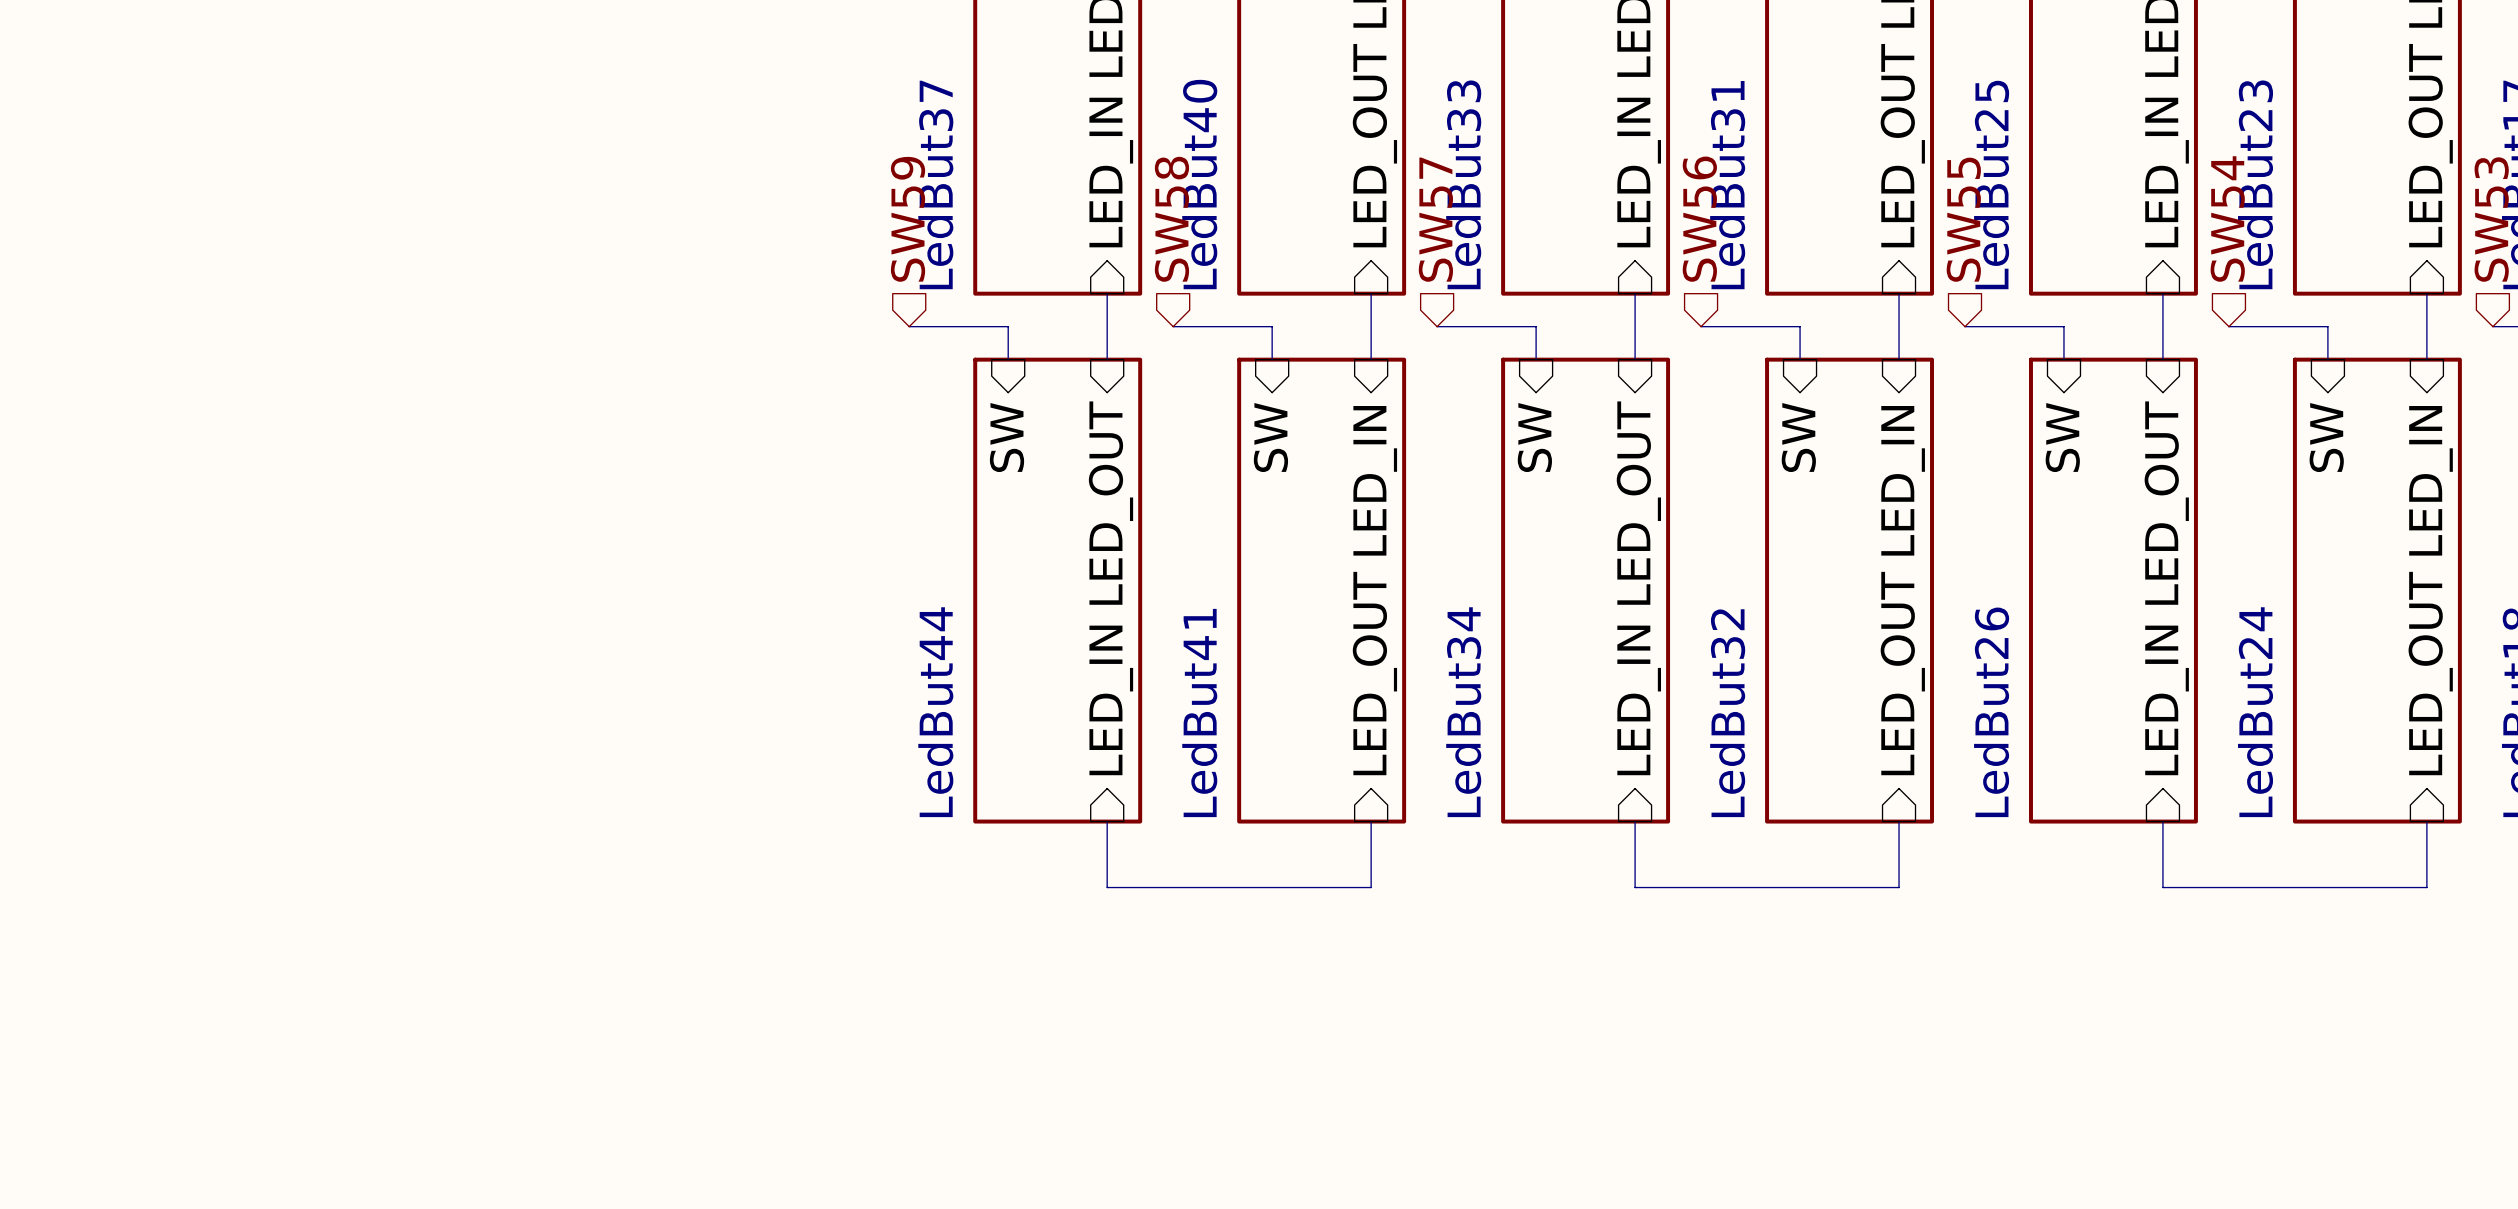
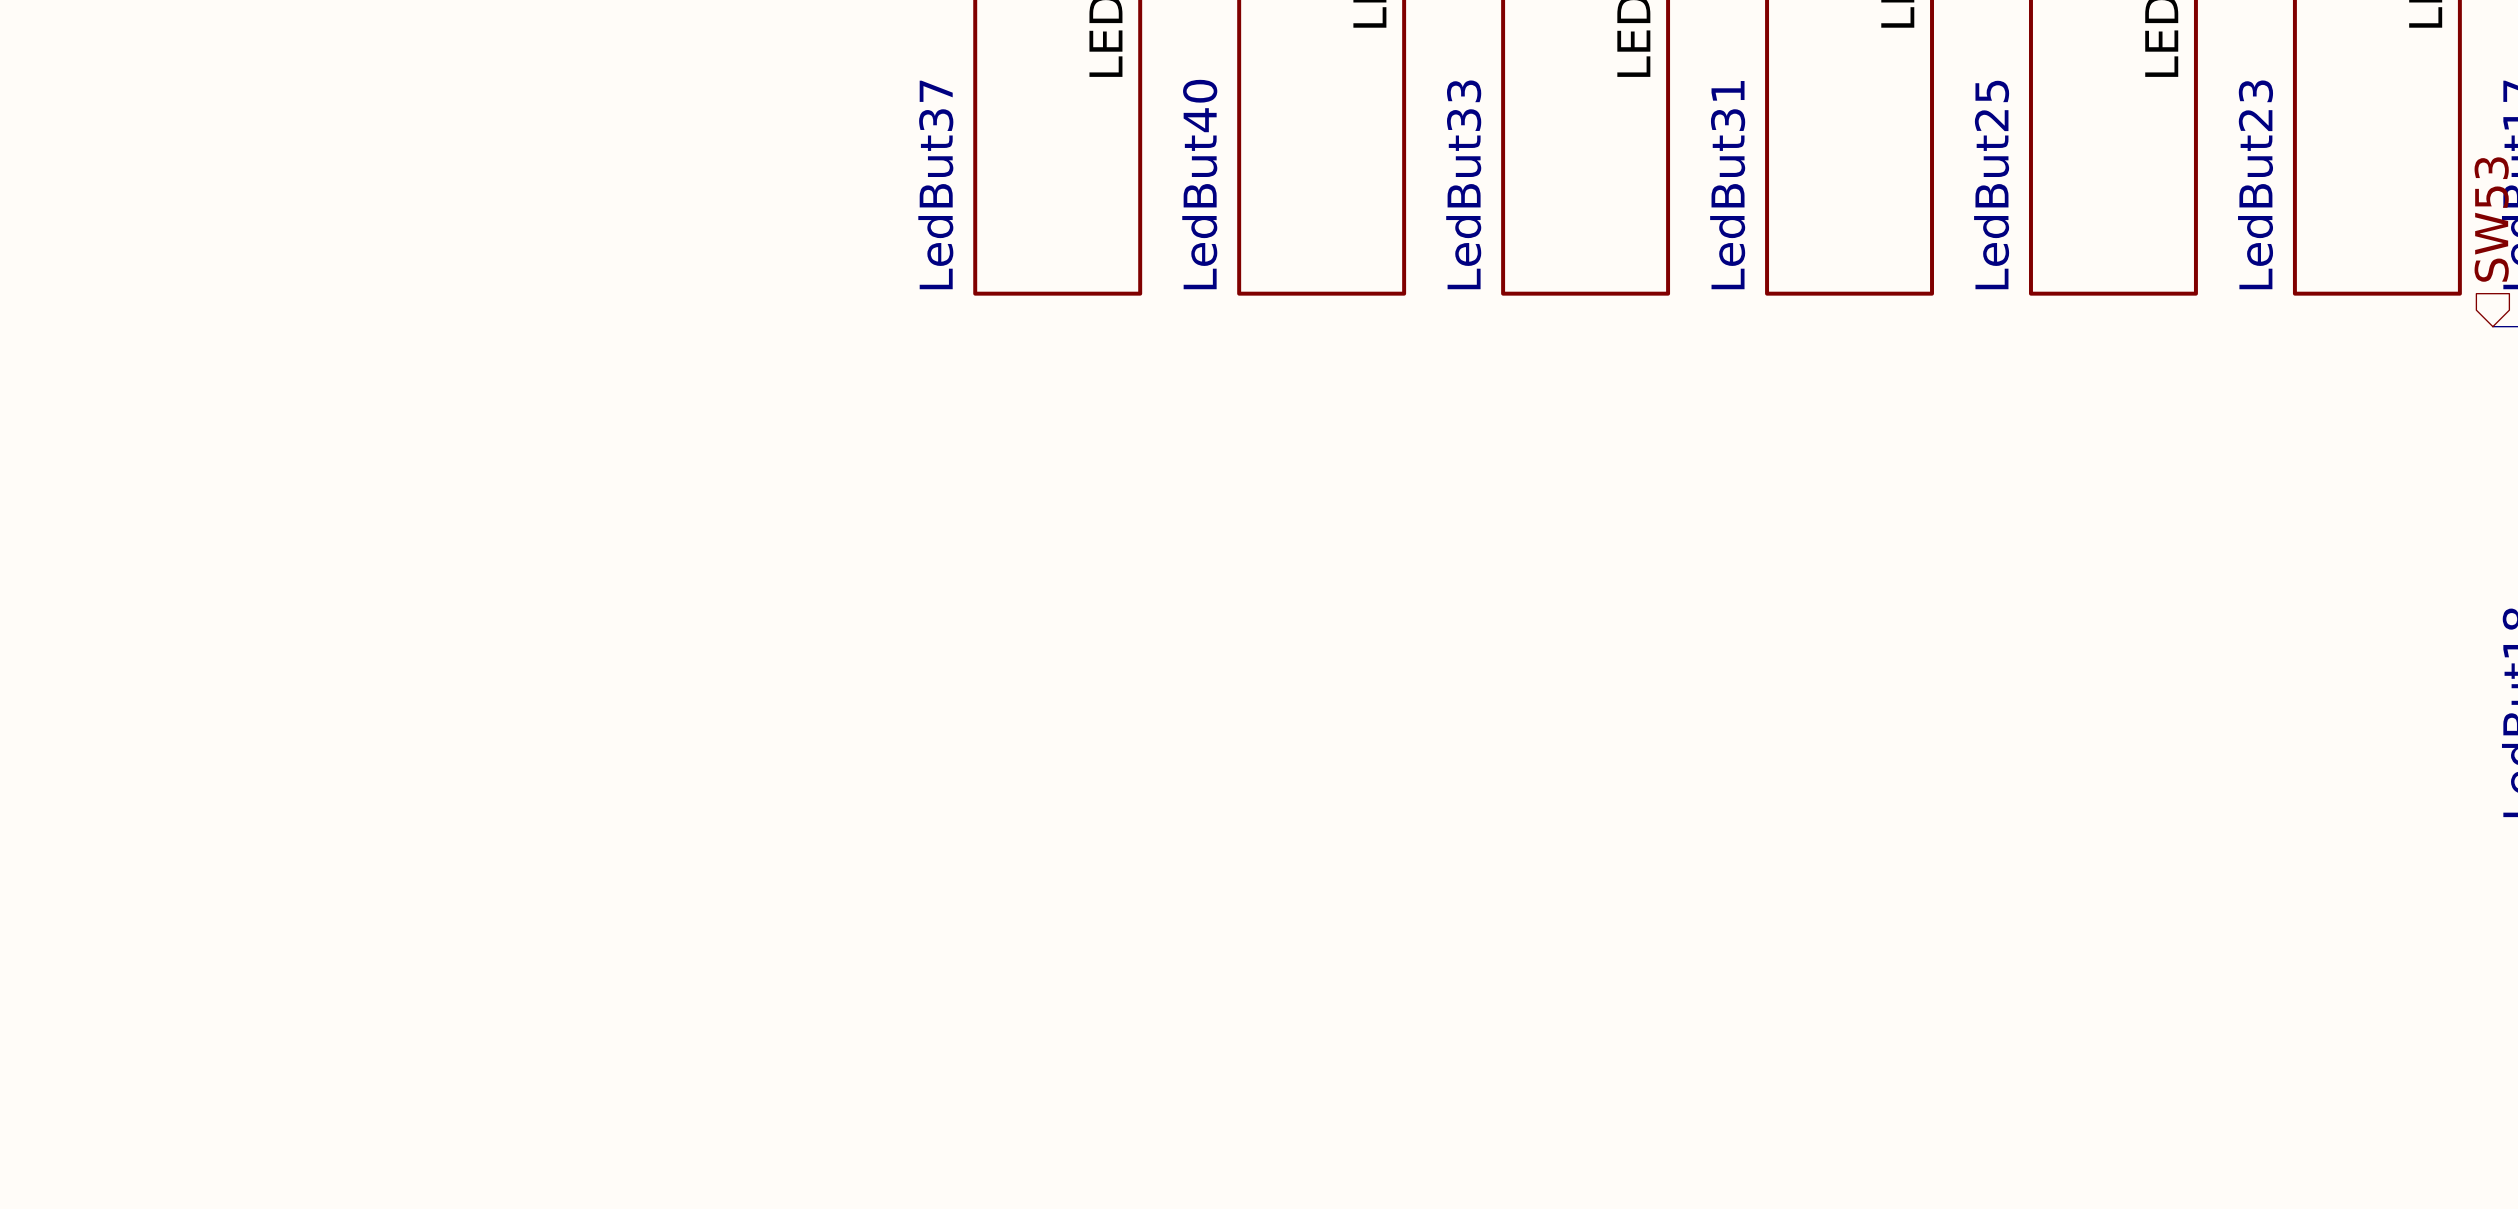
sheet pin: LED_OUT (1374, 145) -> none
sheet pin: LED_OUT (1902, 145) -> none
sheet pin: LED_OUT (2430, 145) -> none
sheet pin: LED_IN (1111, 172) -> none
sheet pin: LED_IN (1639, 172) -> none
sheet pin: LED_IN (2167, 172) -> none
hierarchical label: SW59 (908, 219) -> none
hierarchical label: SW58 (1171, 219) -> none
hierarchical label: SW57 (1435, 219) -> none
hierarchical label: SW56 (1699, 219) -> none
hierarchical label: SW55 (1963, 219) -> none
hierarchical label: SW54 (2227, 219) -> none
wire: (1107, 293) (1107, 359) -> none
wire: (1371, 293) (1371, 359) -> none
wire: (1635, 293) (1635, 359) -> none
wire: (1899, 293) (1899, 359) -> none
wire: (2162, 293) (2162, 359) -> none
wire: (2426, 293) (2426, 359) -> none
wire: (909, 326) (1008, 326) (1008, 359) -> none
wire: (1173, 326) (1272, 326) (1272, 359) -> none
wire: (1437, 326) (1536, 326) (1536, 359) -> none
wire: (1701, 326) (1800, 326) (1800, 359) -> none
wire: (1965, 326) (2063, 326) (2063, 359) -> none
wire: (2228, 326) (2327, 326) (2327, 359) -> none
sheet pin: SW (1007, 437) -> none
sheet pin: SW (1270, 437) -> none
sheet pin: SW (1534, 437) -> none
sheet pin: SW (1798, 437) -> none
sheet pin: SW (2062, 437) -> none
sheet pin: SW (2326, 437) -> none
sheet pin: LED_IN (1375, 480) -> none
sheet pin: LED_IN (1903, 480) -> none
sheet pin: LED_IN (2431, 480) -> none
sheet pin: LED_OUT (1110, 503) -> none
sheet pin: LED_OUT (1638, 503) -> none
sheet pin: LED_OUT (2166, 503) -> none
sheet LedBut44: (1057, 590) -> none
sheet LedBut41: (1321, 590) -> none
sheet LedBut34: (1585, 590) -> none
sheet LedBut32: (1849, 590) -> none
sheet LedBut26: (2113, 590) -> none
sheet LedBut24: (2377, 590) -> none
sheet pin: LED_OUT (1374, 673) -> none
sheet pin: LED_OUT (1902, 673) -> none
sheet pin: LED_OUT (2430, 673) -> none
sheet pin: LED_IN (1111, 700) -> none
sheet pin: LED_IN (1639, 700) -> none
sheet pin: LED_IN (2167, 700) -> none
wire: (1107, 821) (1107, 887) (1371, 887) (1371, 821) -> none
wire: (1635, 821) (1635, 887) (1899, 887) (1899, 821) -> none
wire: (2162, 821) (2162, 887) (2426, 887) (2426, 821) -> none

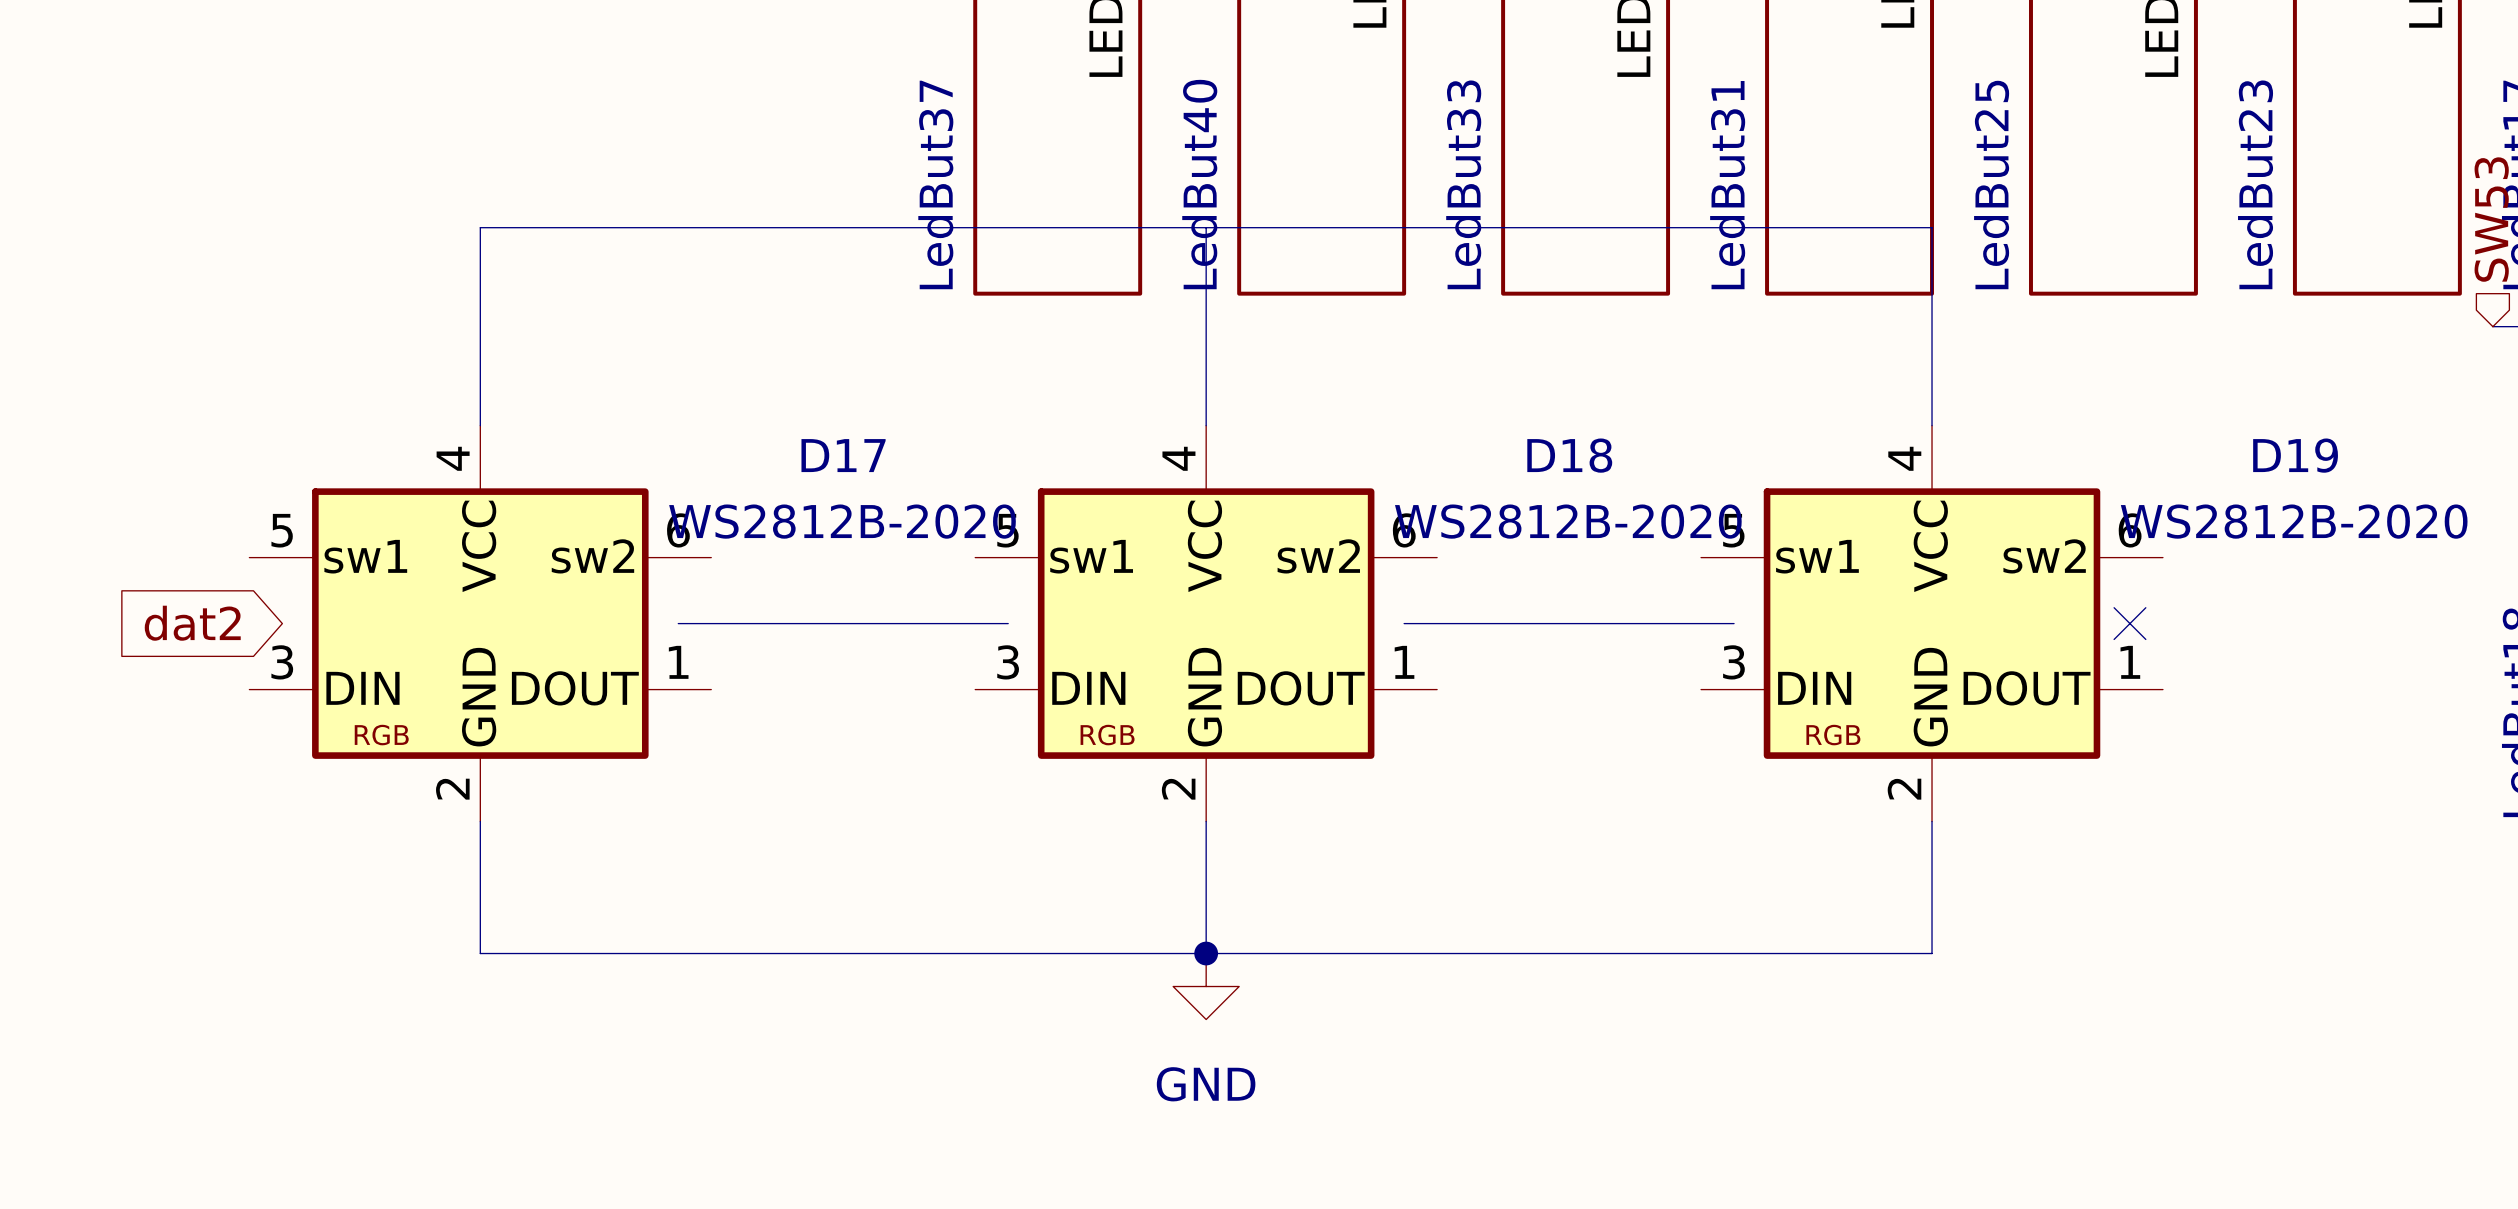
wire: none -> (1206, 227) (1206, 425)
wire: none -> (480, 425) (480, 227) (1932, 227) (1932, 425)
global label: none -> dat2 (192, 623)
D17: none -> WS2812B-2020 (480, 623)
wire: none -> (678, 623) (1008, 623)
D18: none -> WS2812B-2020 (1206, 623)
wire: none -> (1404, 623) (1734, 623)
D19: none -> WS2812B-2020 (1932, 623)
no-connect mark: none -> (2129, 623)
wire: none -> (480, 821) (480, 953) (1932, 953) (1932, 821)
wire: none -> (1206, 821) (1206, 953)
junction: none -> (1206, 953)
power symbol: none -> GND (1206, 986)

